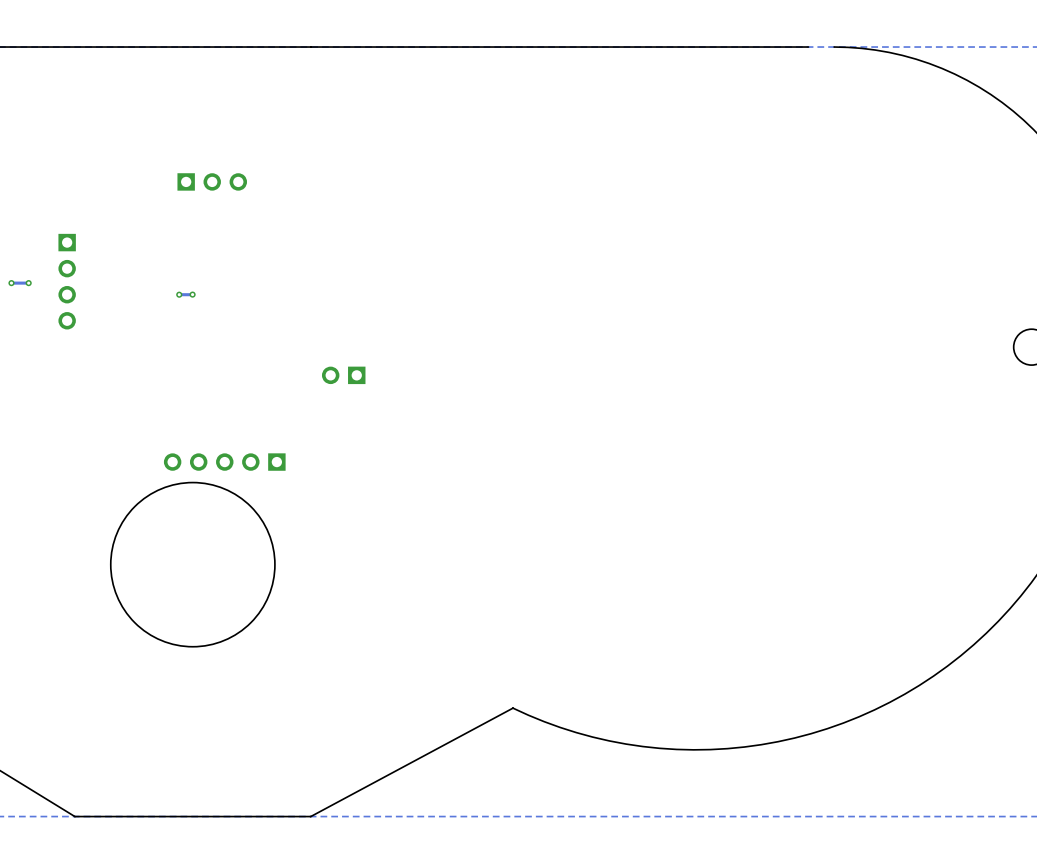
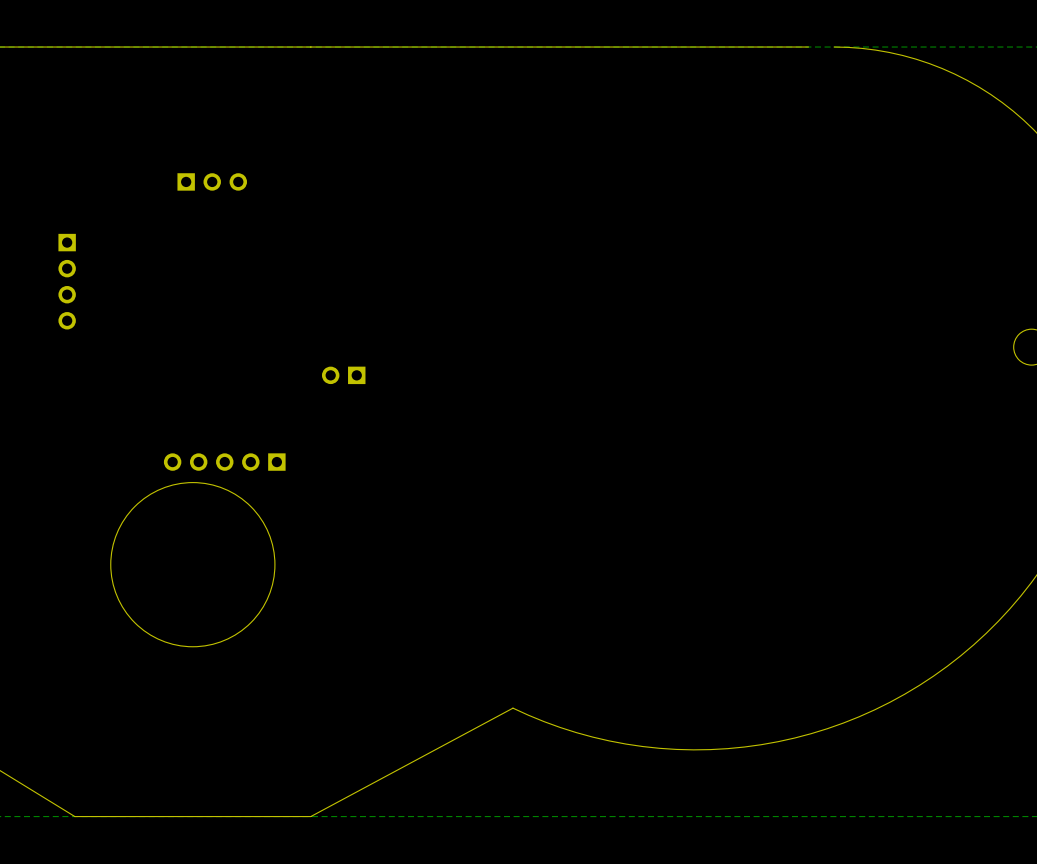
via: (11, 283) -> none
track: (28, 283) (11, 283) -> none
via: (28, 283) -> none
via: (179, 294) -> none
track: (192, 294) (179, 294) -> none
via: (192, 294) -> none

